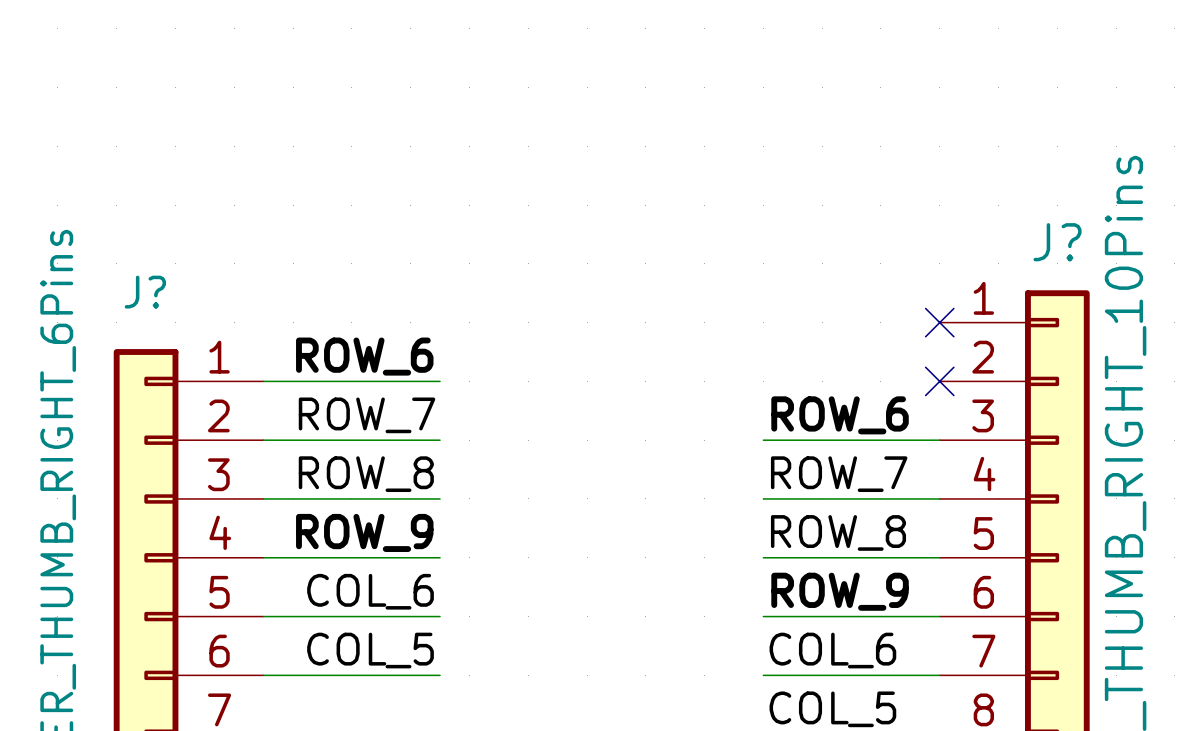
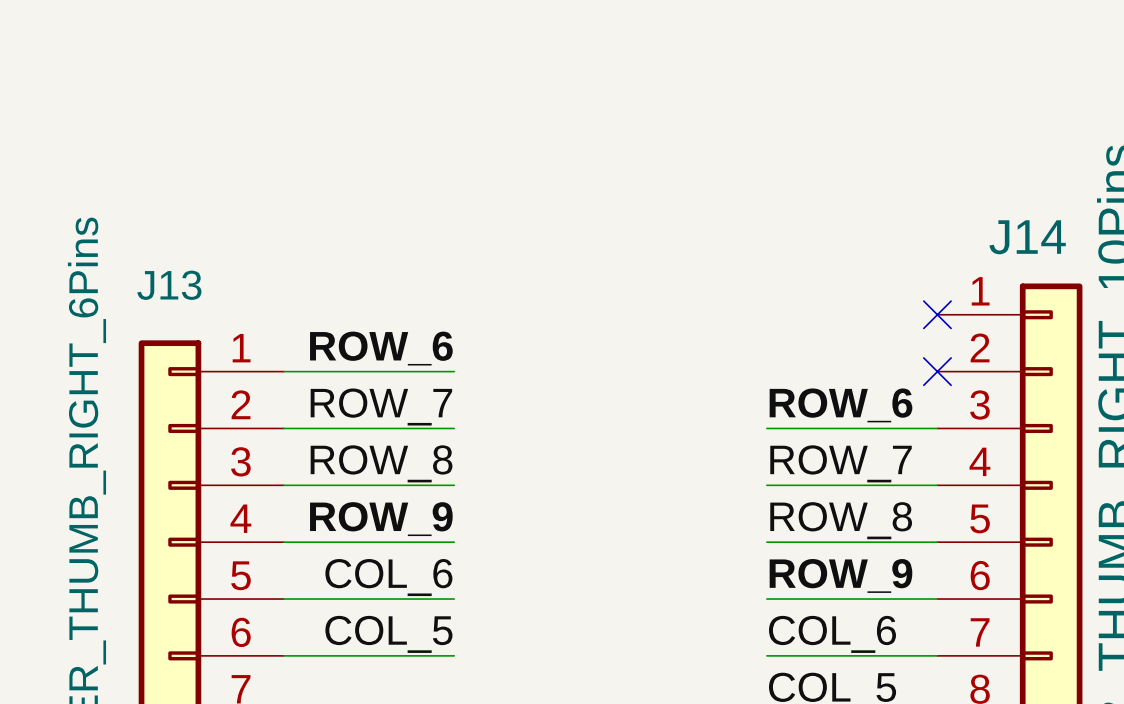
J? name: J? (1057, 242) -> J14 (1027, 237)
J? name: J? (145, 292) -> J13 (169, 285)

